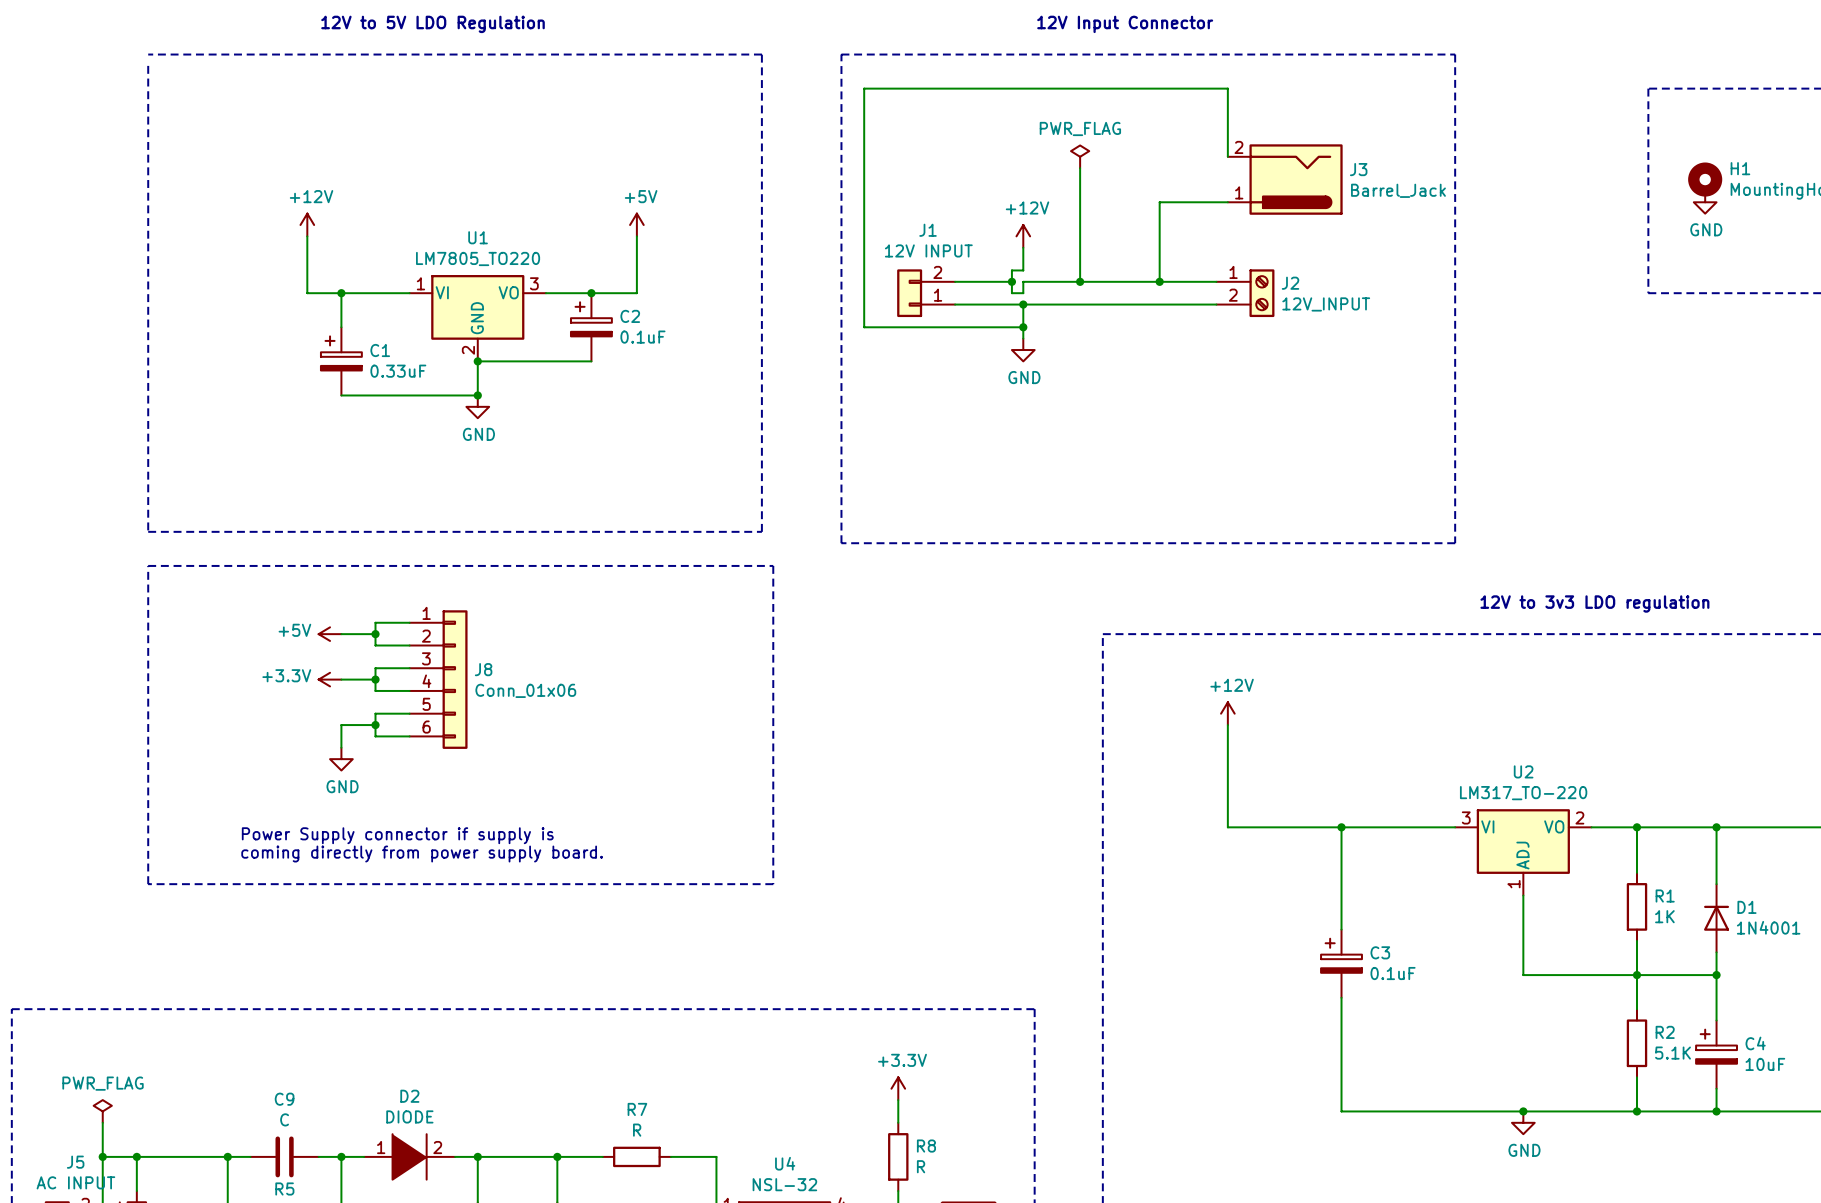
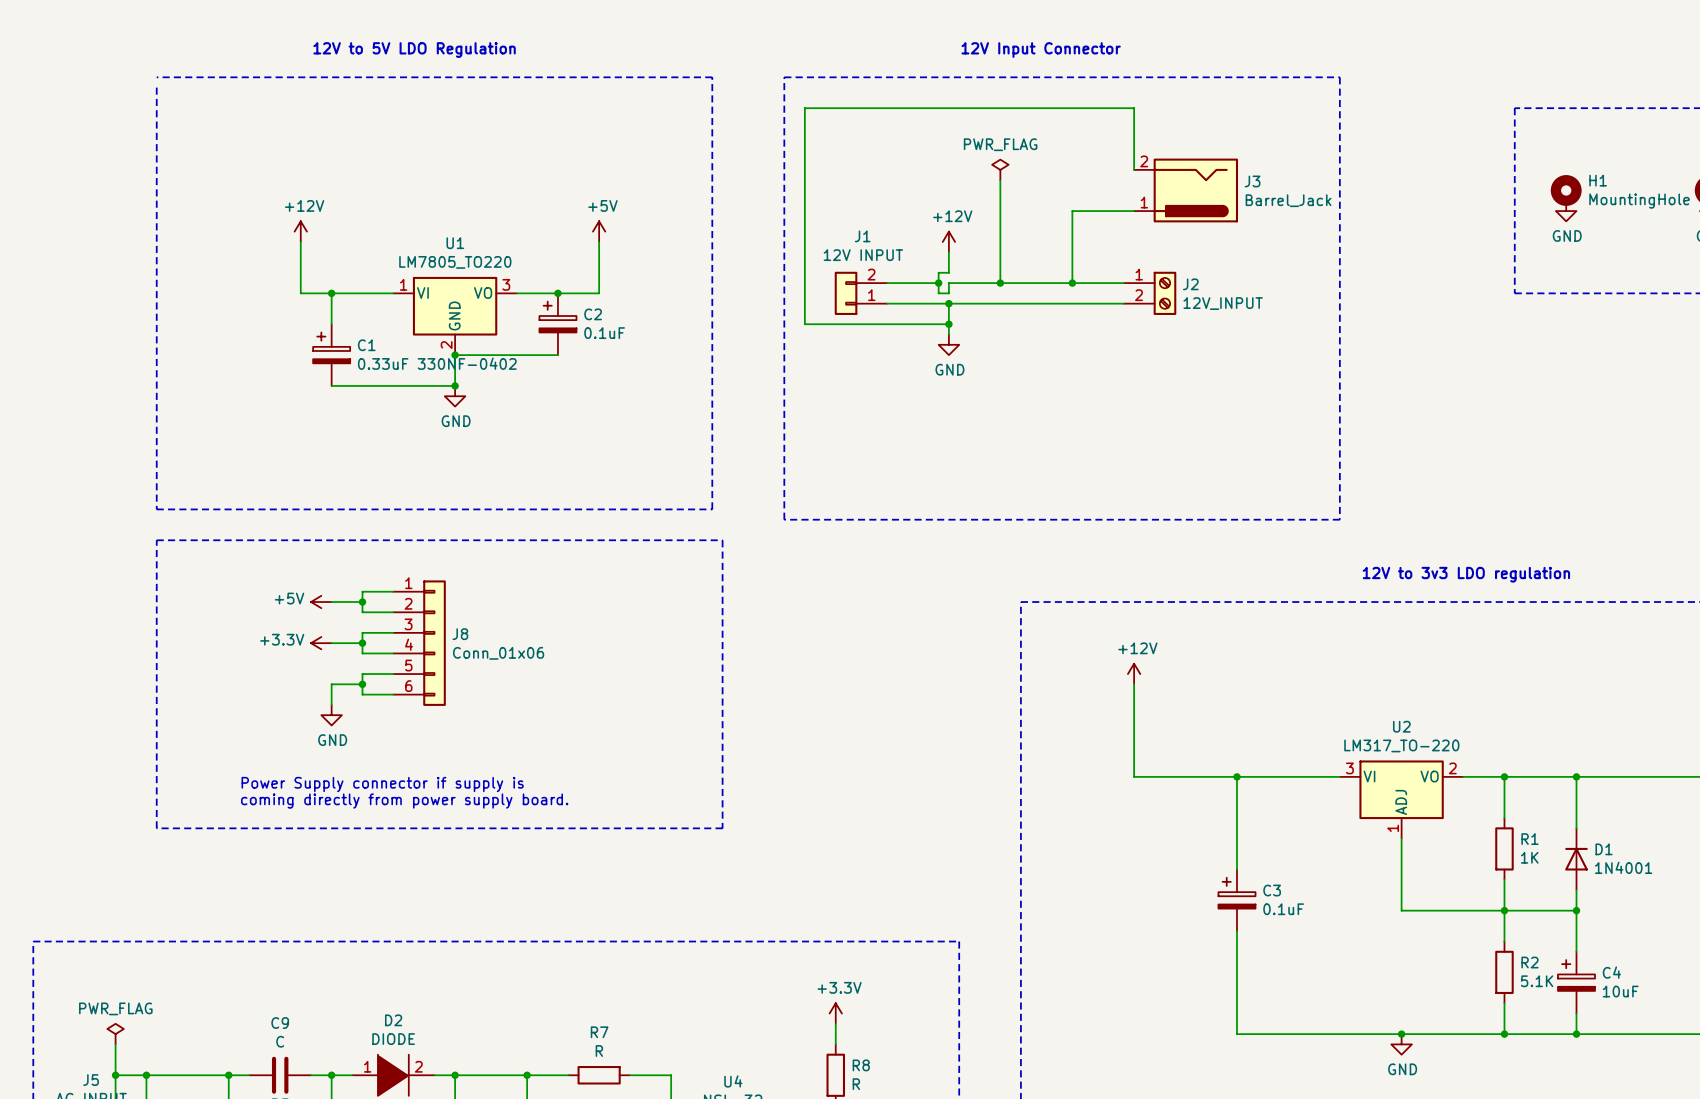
C1 value: 0.33uF (398, 371) -> 0.33uF 330NF-0402 (437, 363)

